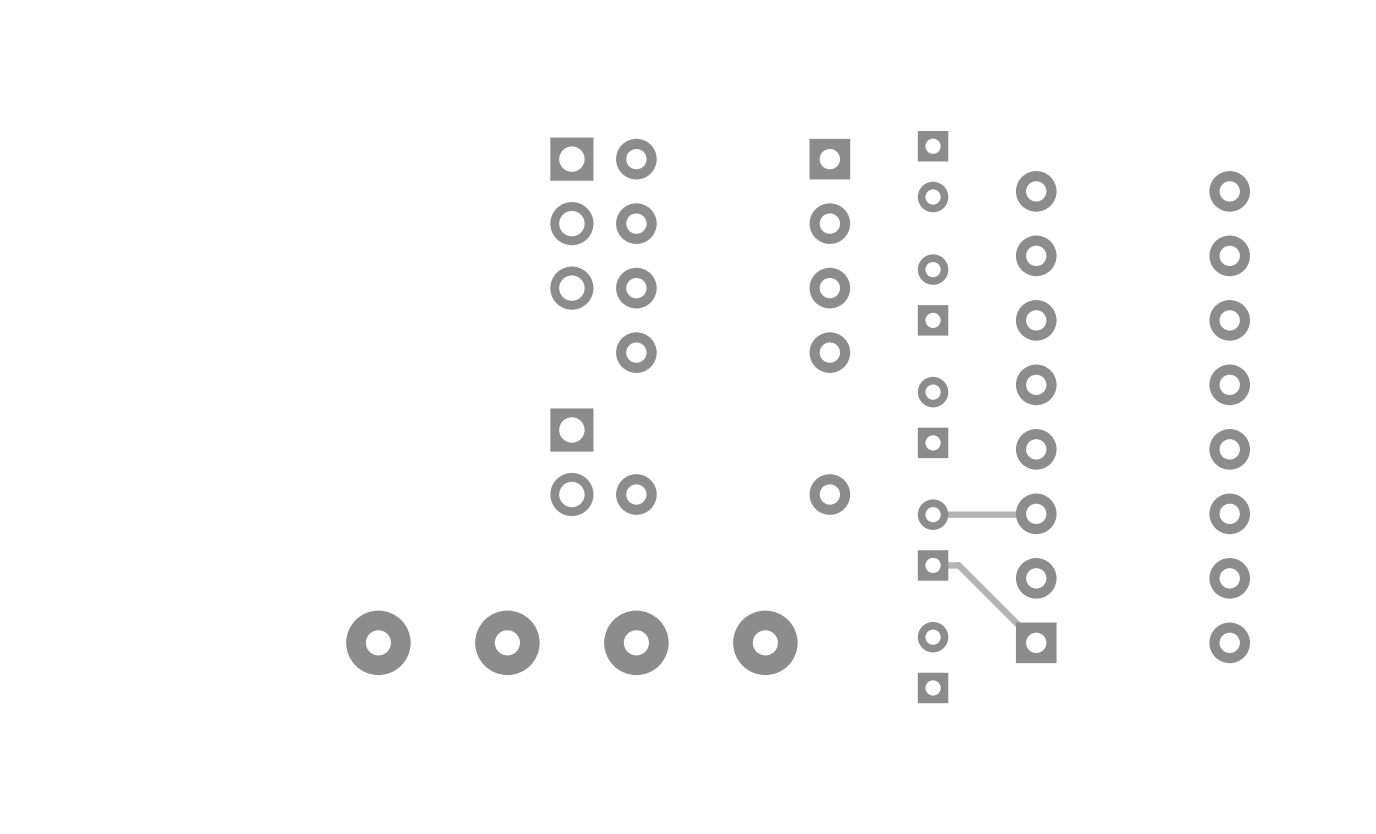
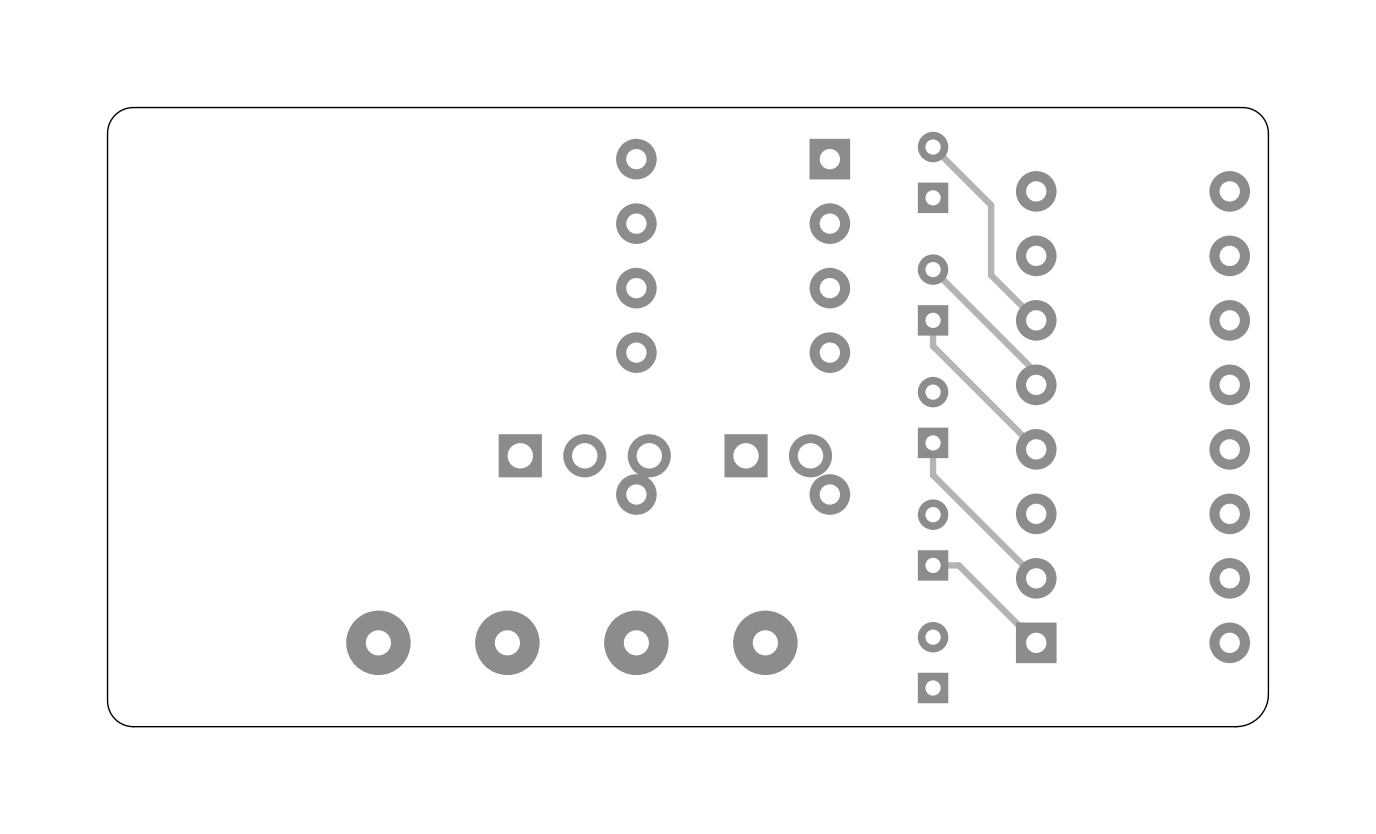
board edge: none -> (1242, 107) (133, 107) (120, 111) (111, 120) (107, 133) (107, 700) (111, 713) (120, 723) (133, 726) (1236, 726) (1252, 722) (1264, 710) (1268, 694) (1268, 133) (1266, 123) (1260, 115) (1252, 109) (1242, 107)
track: none -> (933, 147) (991, 205) (991, 275) (1036, 320)
part rotation: 0° (933, 171) -> 180° (933, 172)
part: (571, 223) -> none
track: none -> (933, 269) (1036, 372) (1036, 384)
track: none -> (933, 320) (933, 346) (1036, 449)
part footprint: [550, 408, 594, 517] -> [498, 434, 671, 478]
track: none -> (933, 442) (933, 475) (1036, 578)
part: none -> (778, 455)
track: (1036, 513) (933, 514) -> none

